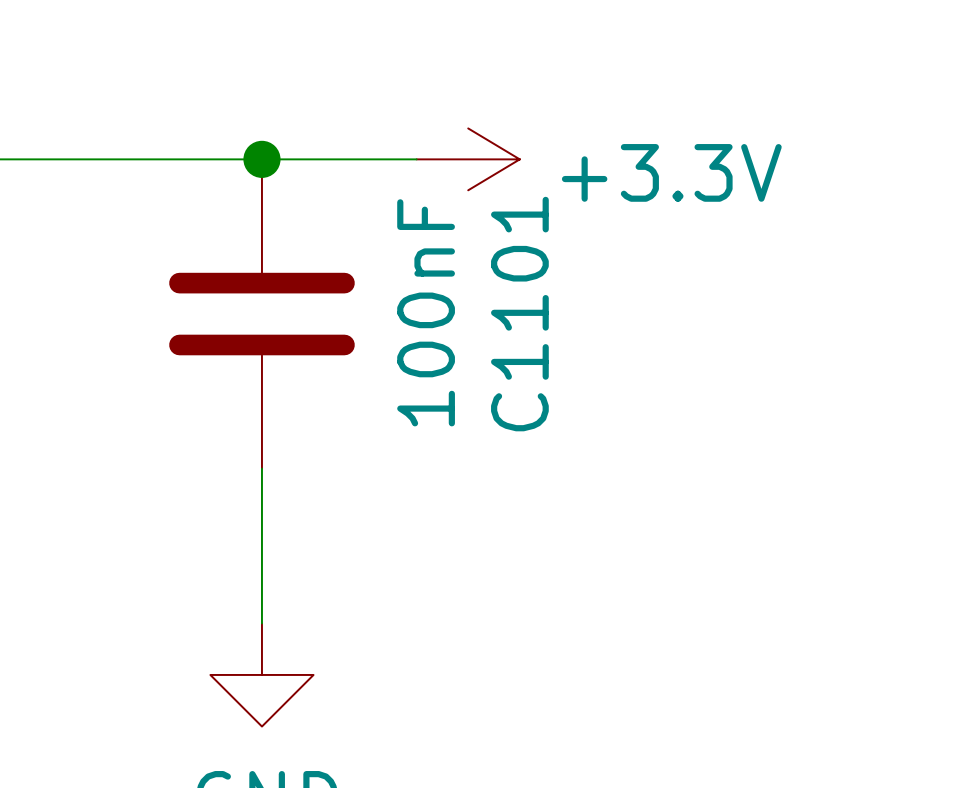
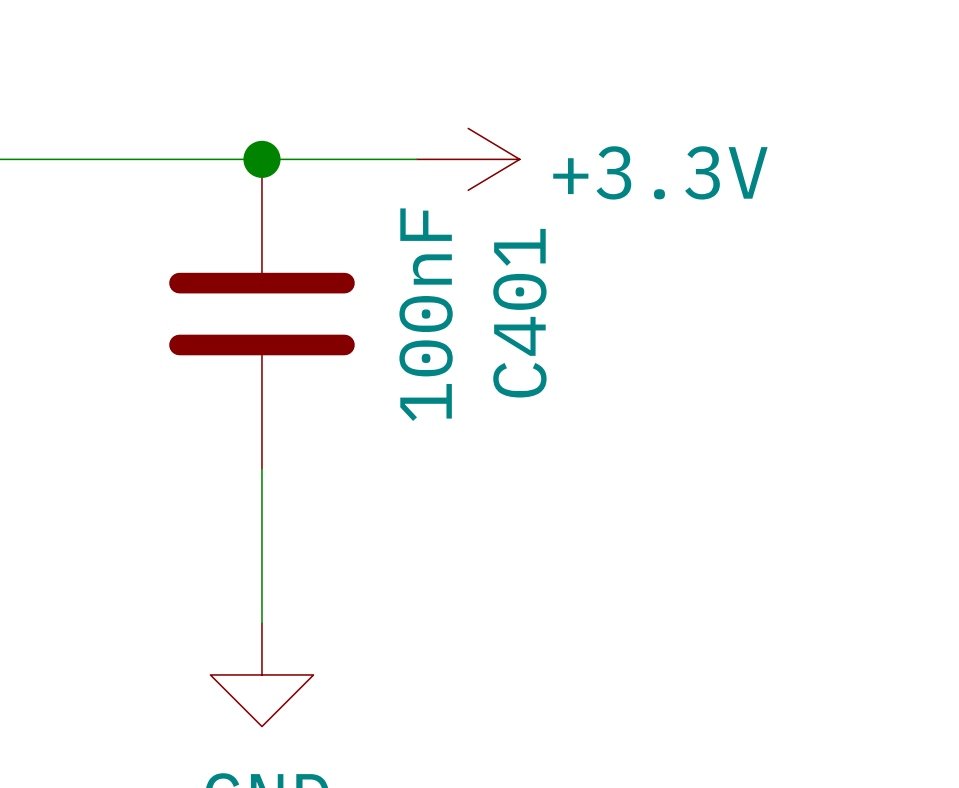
C1101 name: C1101 (519, 314) -> C401 (519, 313)

